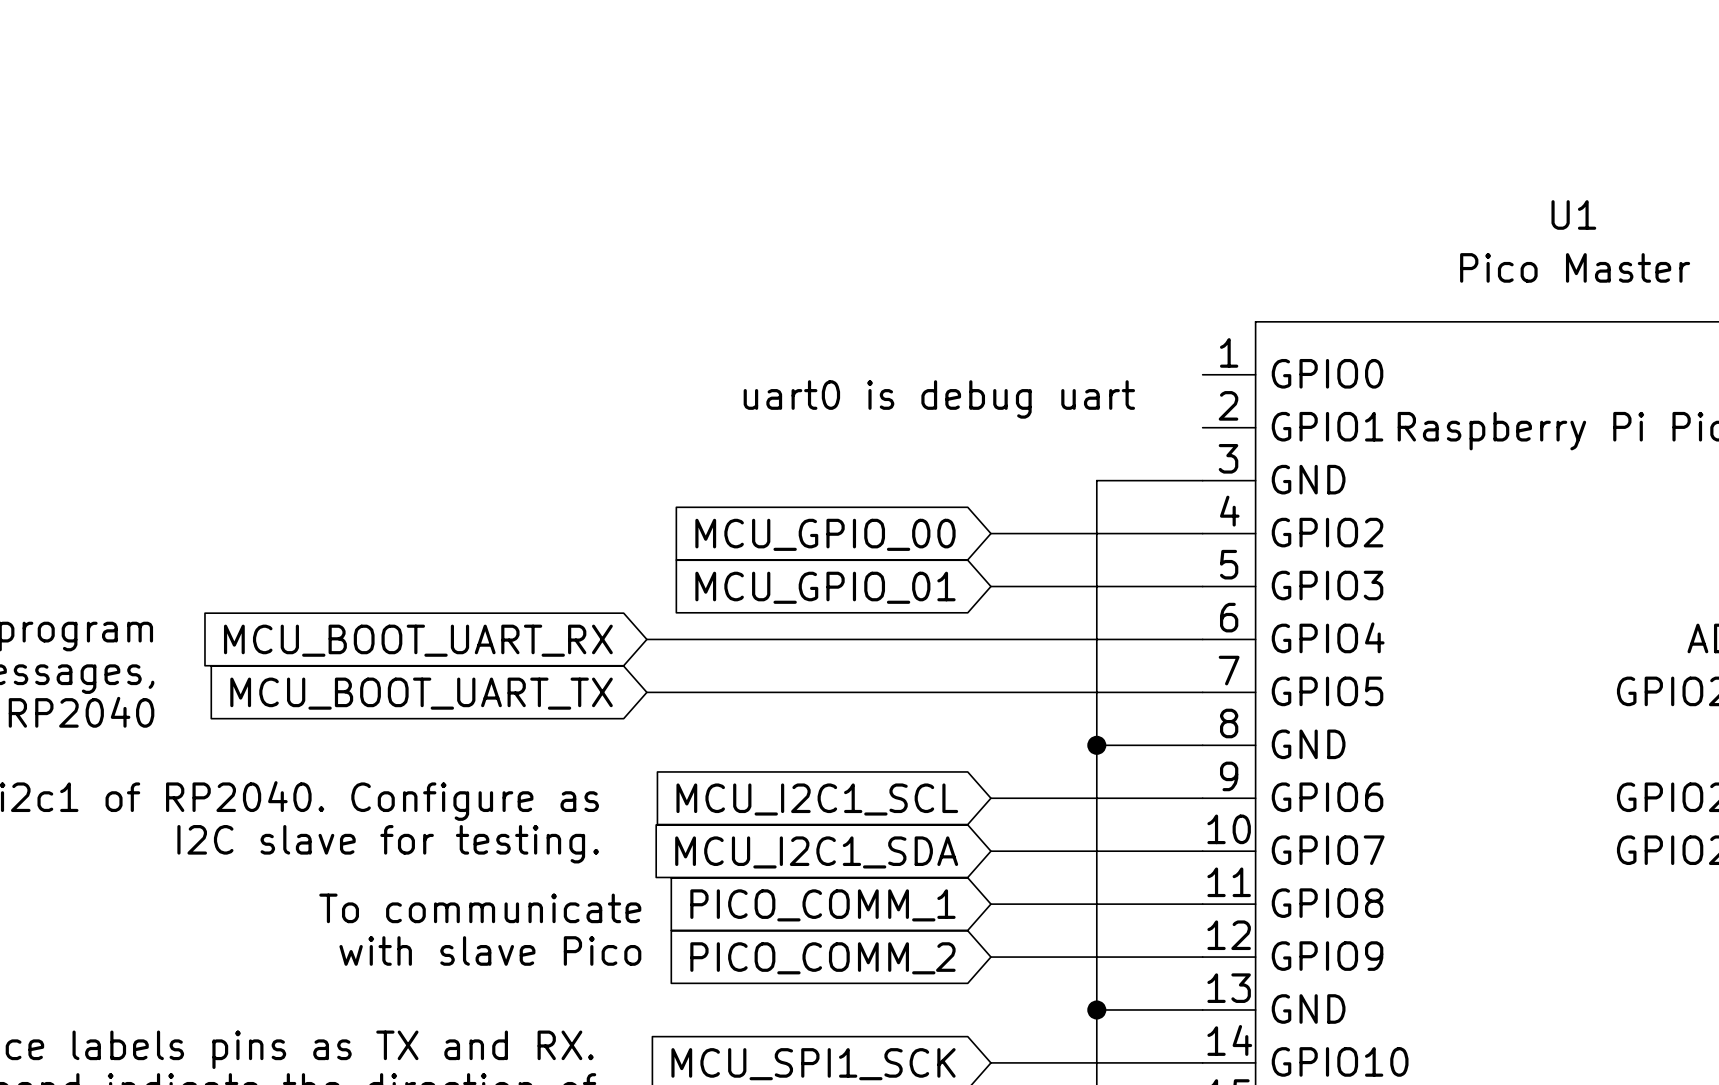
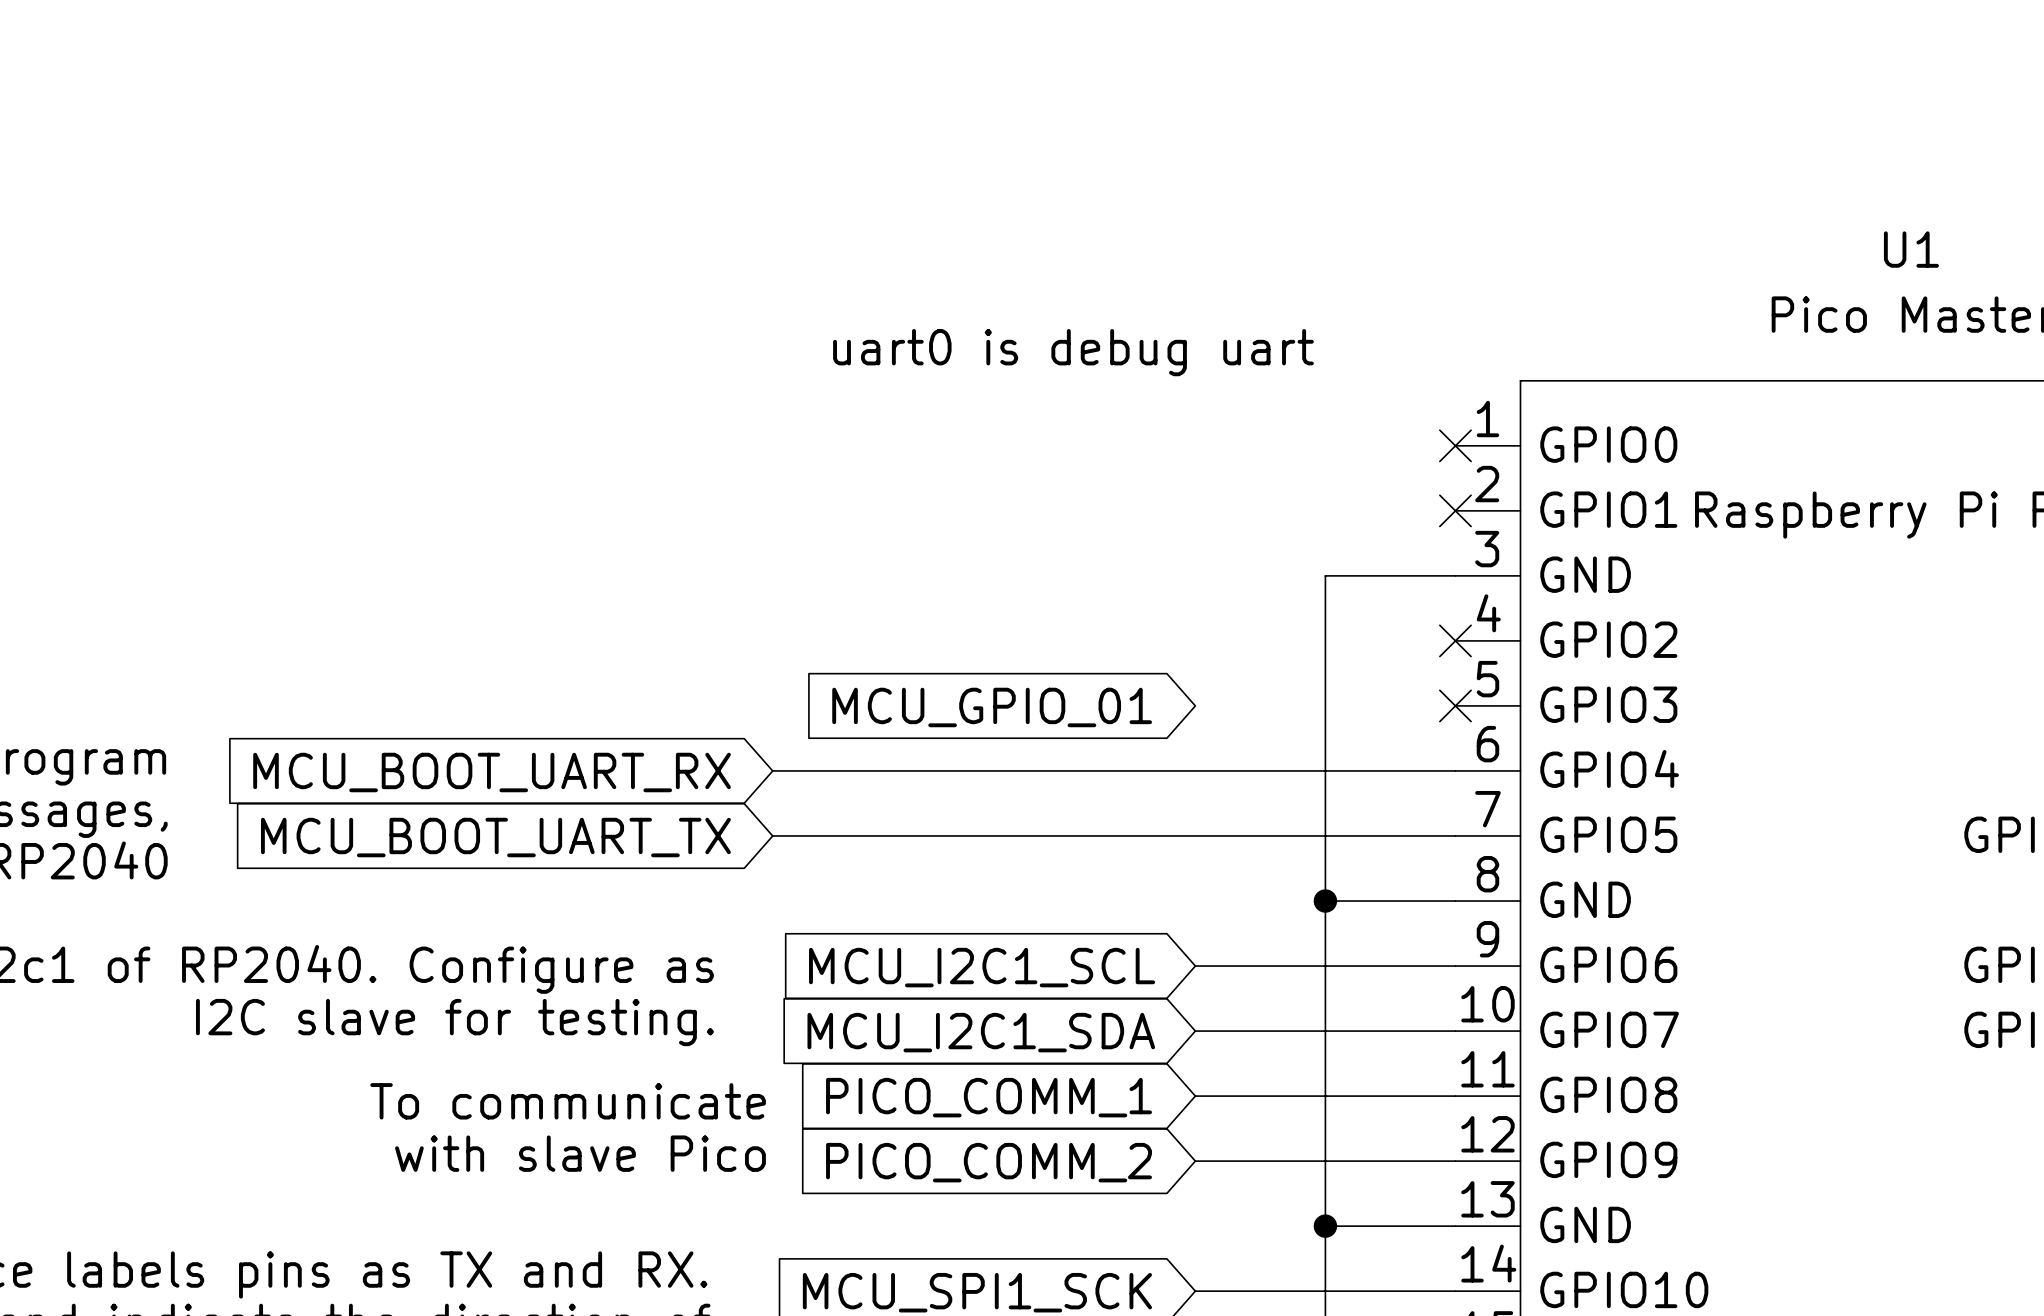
no-connect mark: none -> (1455, 445)
text position: uart0 is debug uart (939, 399) -> uart0 is debug uart (1073, 352)
no-connect mark: none -> (1455, 510)
wire: (990, 533) (1202, 533) -> none
no-connect mark: none -> (1455, 640)
global label: MCU_GPIO_00 (825, 534) -> none
wire: (990, 586) (1202, 586) -> none
no-connect mark: none -> (1455, 705)

